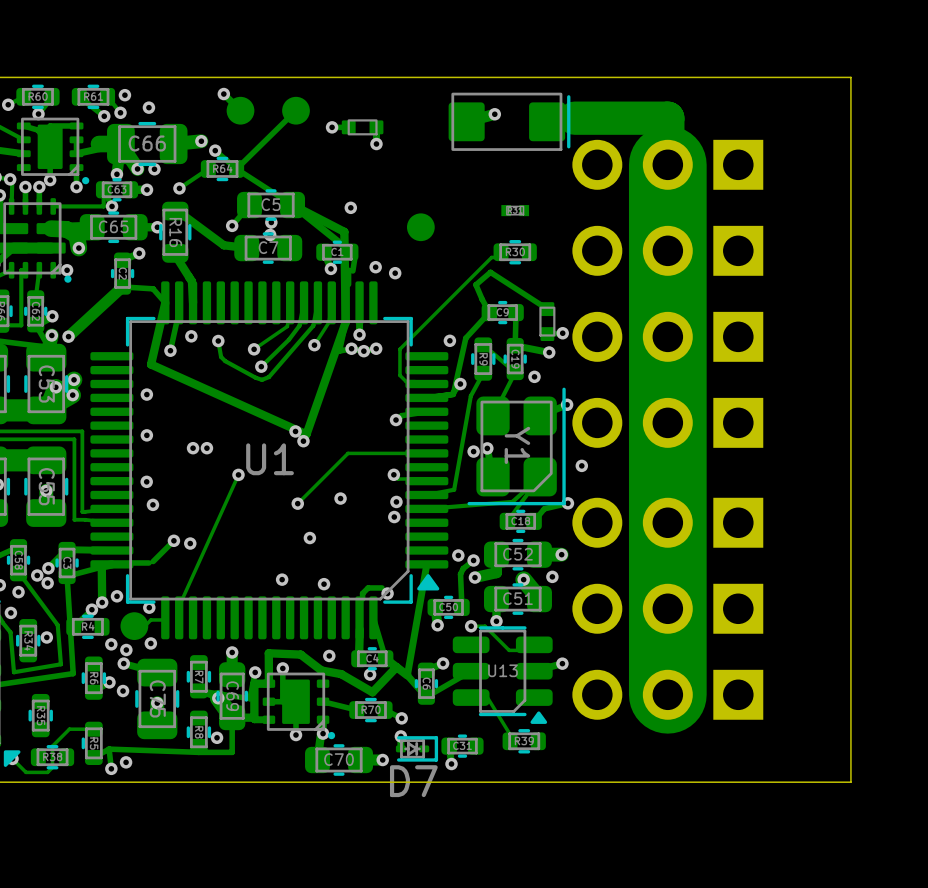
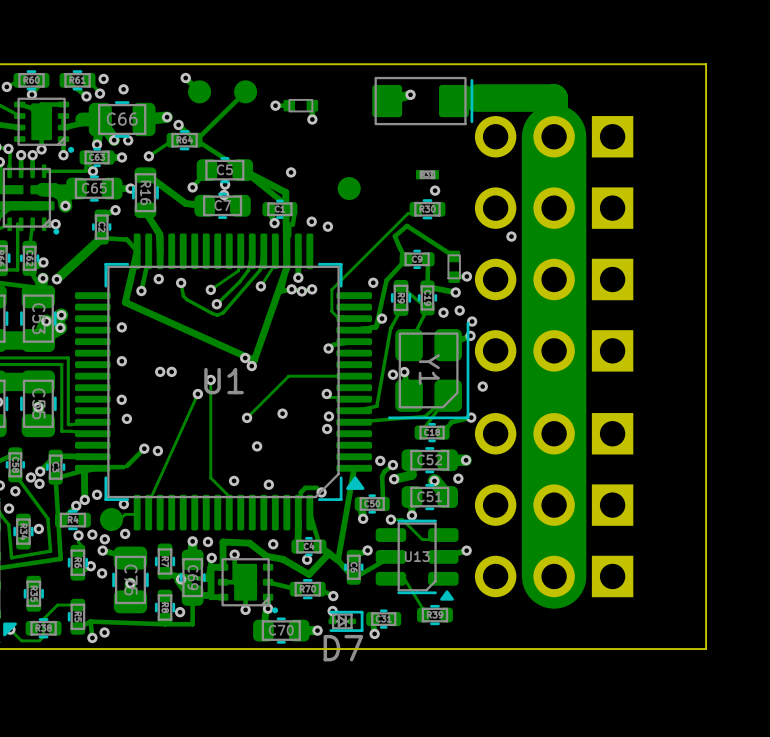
via: none -> (435, 190)
via: none -> (511, 236)
via: none -> (459, 310)
via: none -> (472, 321)
track: none -> (210, 379) (210, 477) (229, 496) (229, 512)
via: none -> (210, 379)
track: none -> (78, 535) (78, 542) (83, 546)
via: none -> (78, 535)
via: none -> (207, 541)

